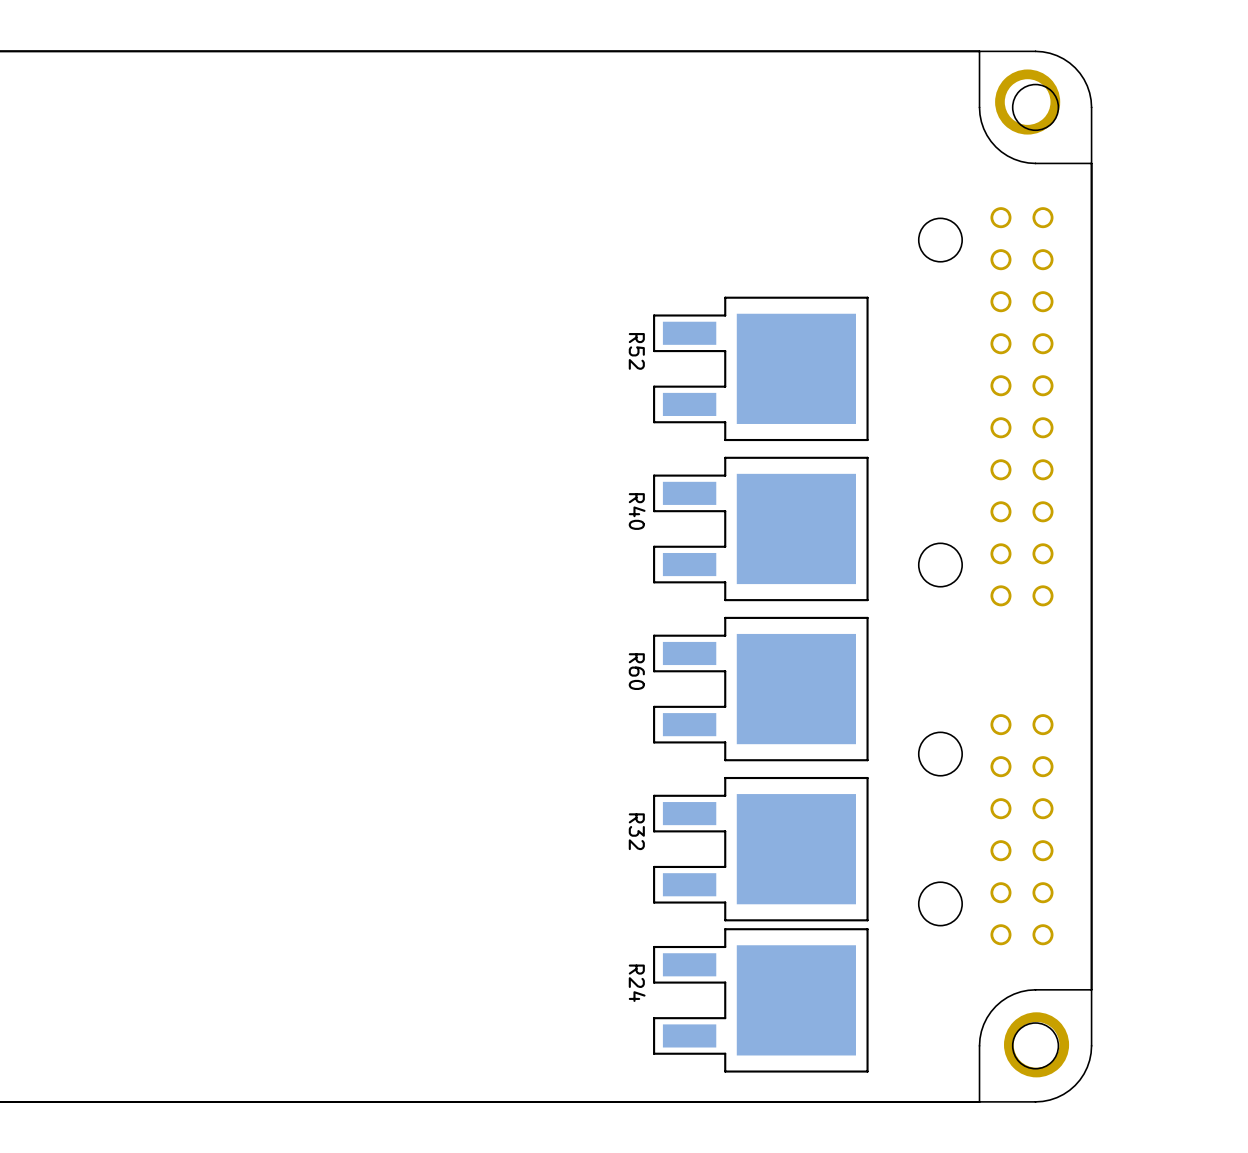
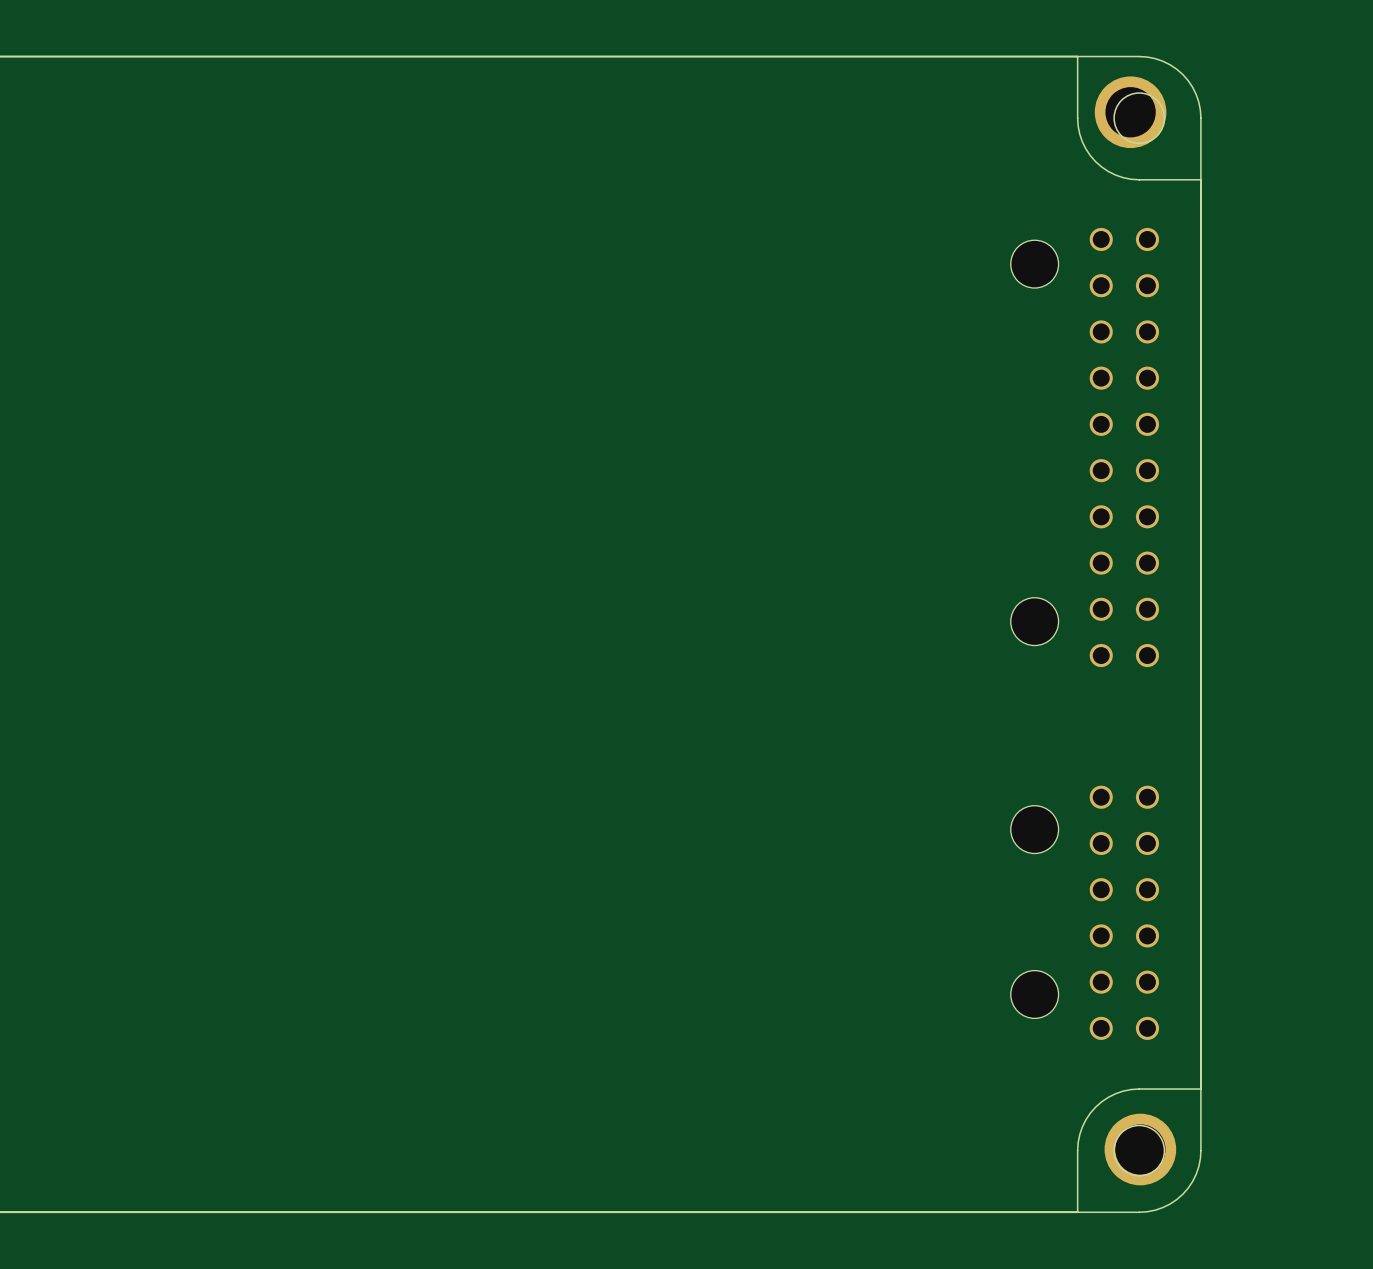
R52: (760, 368) -> none
R40: (760, 528) -> none
R60: (760, 689) -> none
R32: (760, 849) -> none
R24: (760, 1000) -> none

